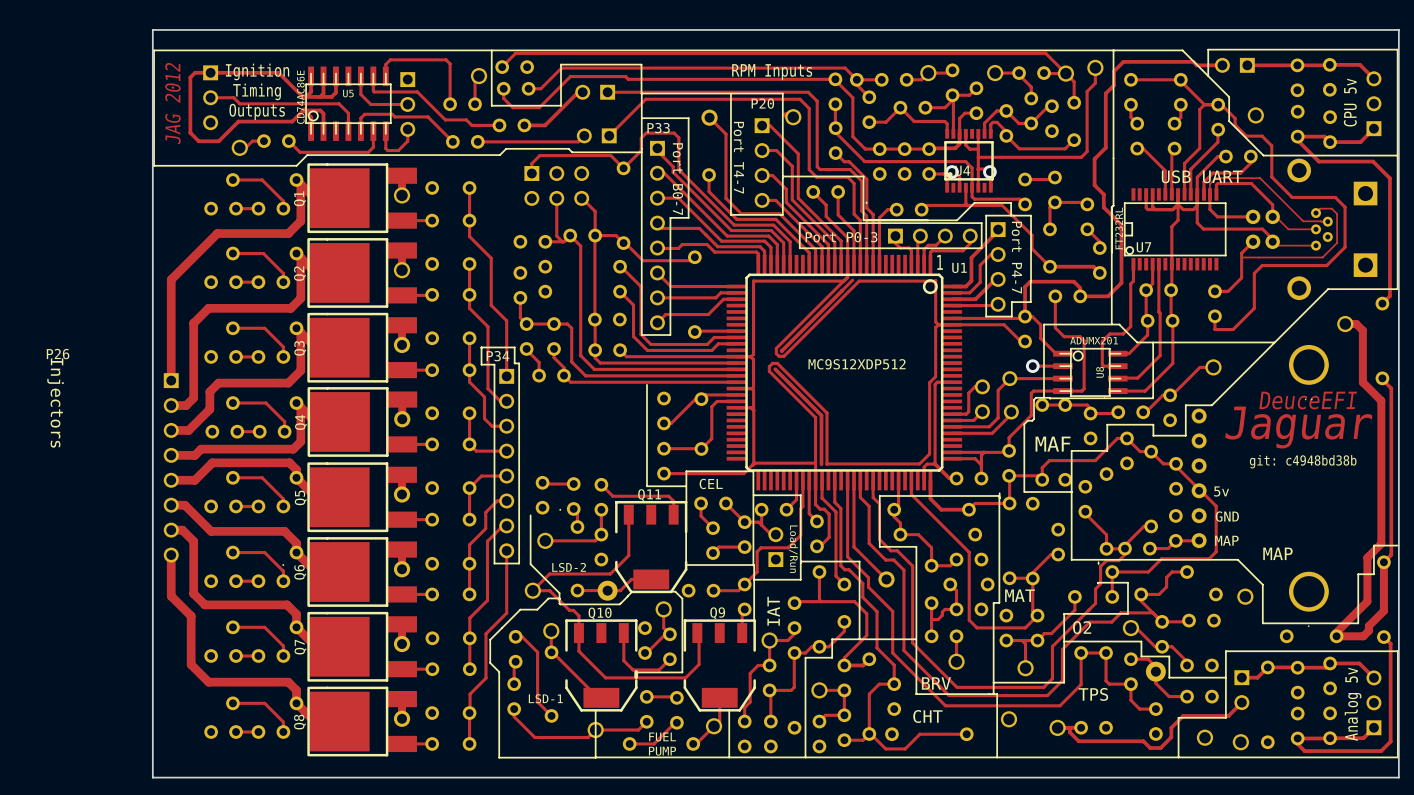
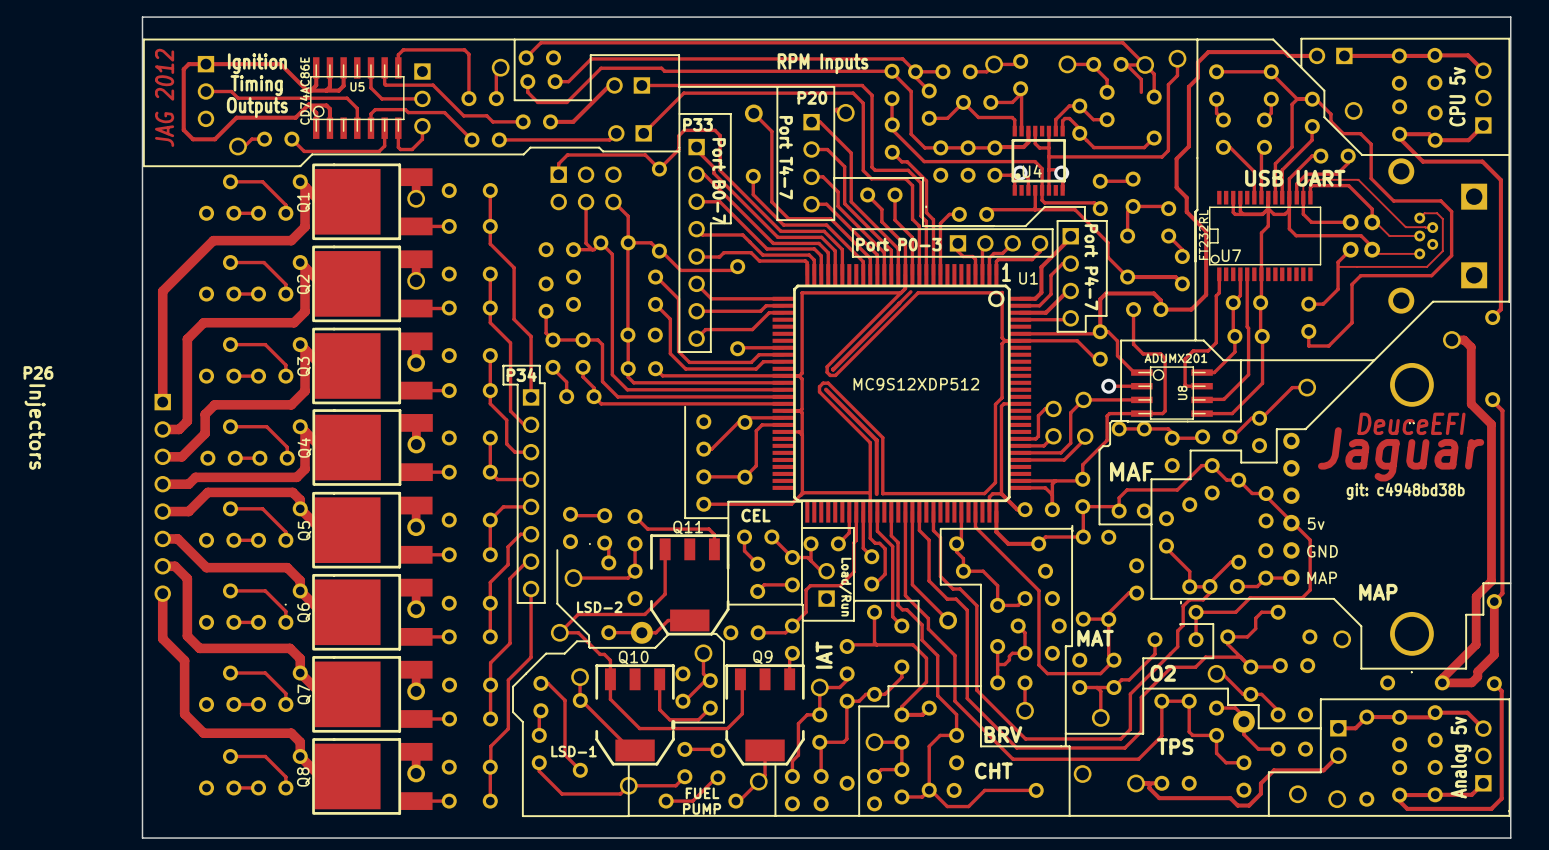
track: none -> (1126, 64) (1141, 79) (1141, 92)
track: (976, 88) (969, 95) (952, 95) -> none
part: (976, 100) -> none
track: (1051, 106) (1048, 106) (1031, 123) -> none
track: (976, 113) (964, 113) (959, 118) (959, 133) -> none
part: (1051, 118) -> none

